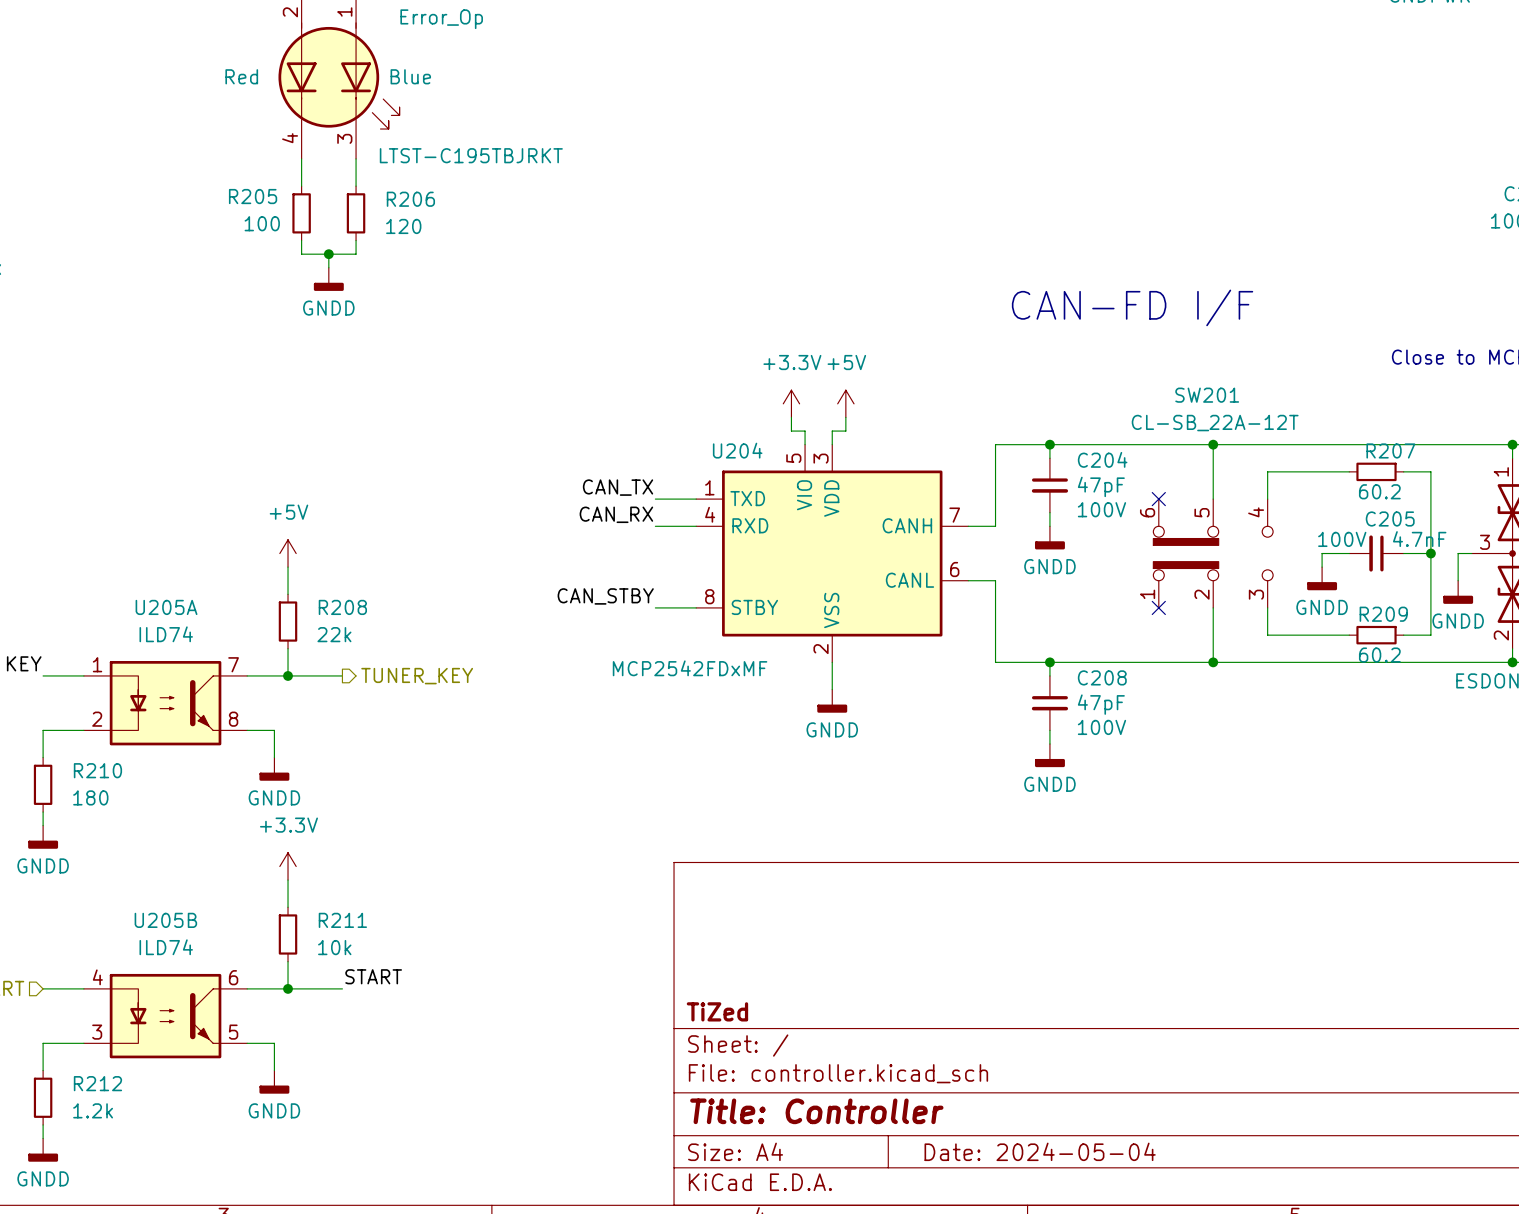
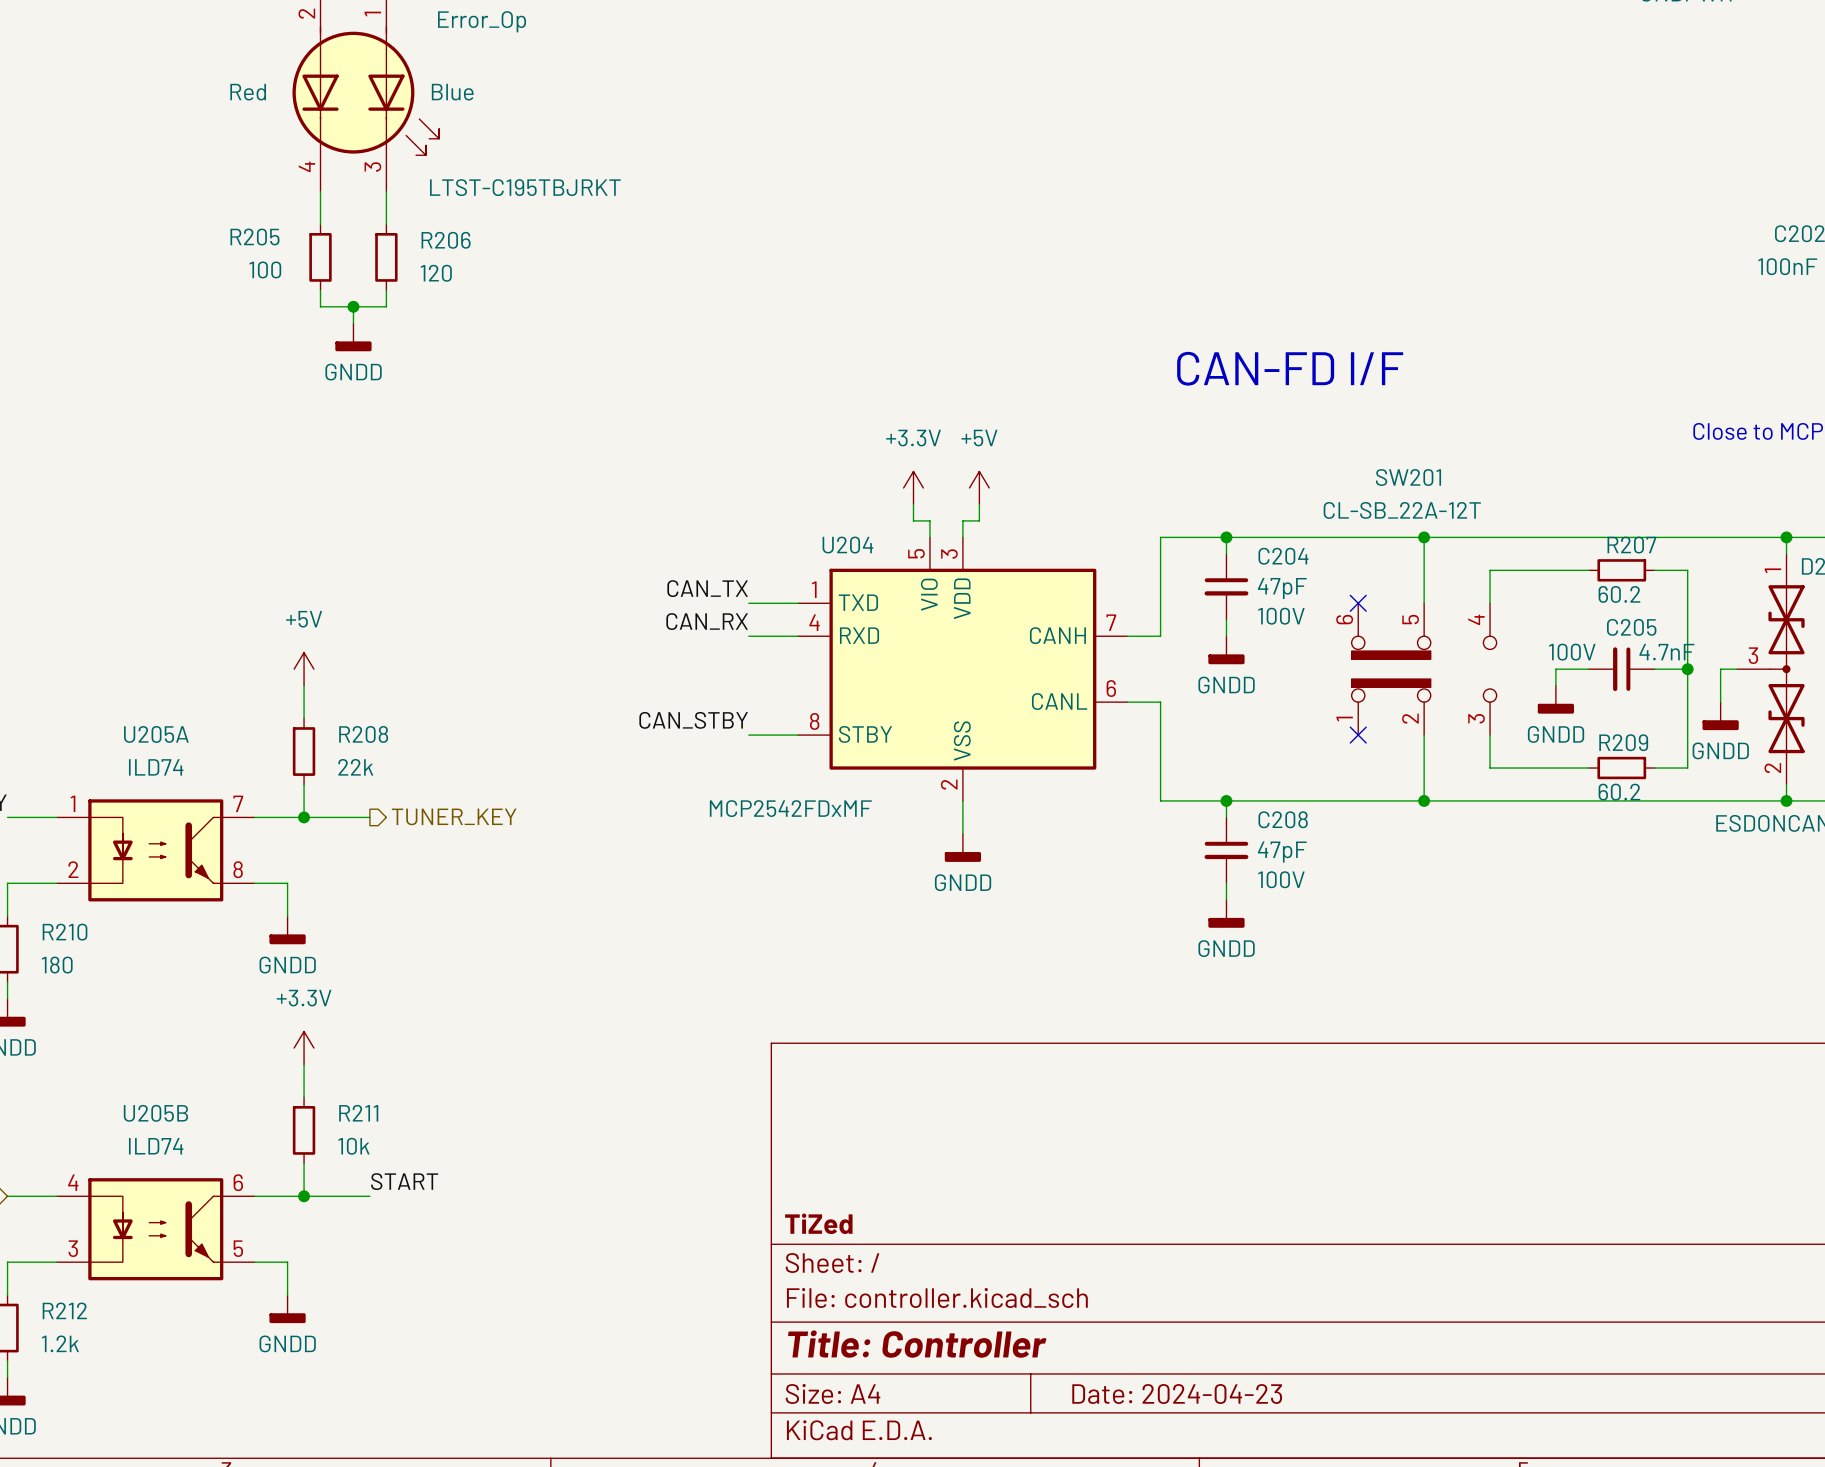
title block: Date: 2024-05-04 (1040, 1151) -> Date: 2024-04-23 (1177, 1394)

